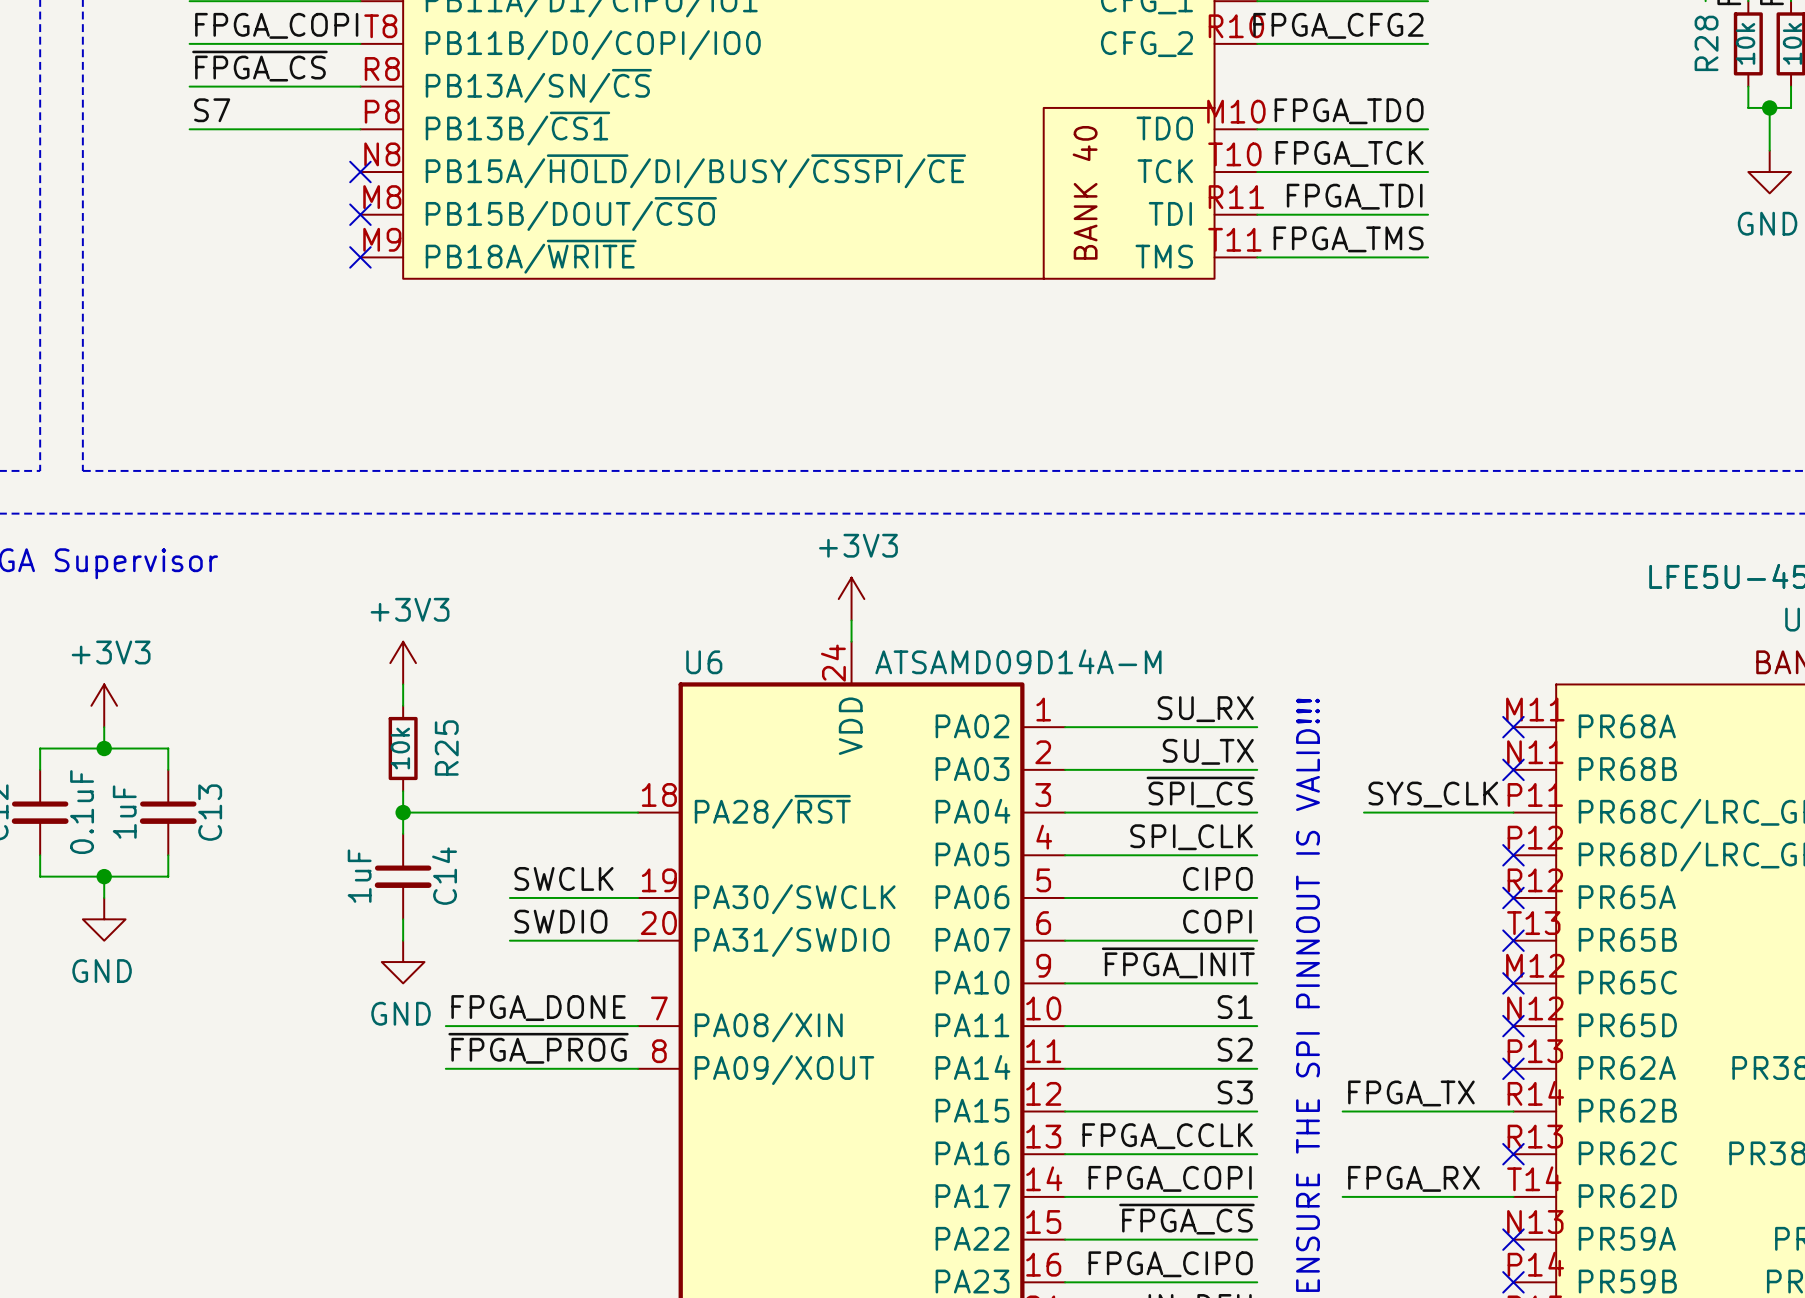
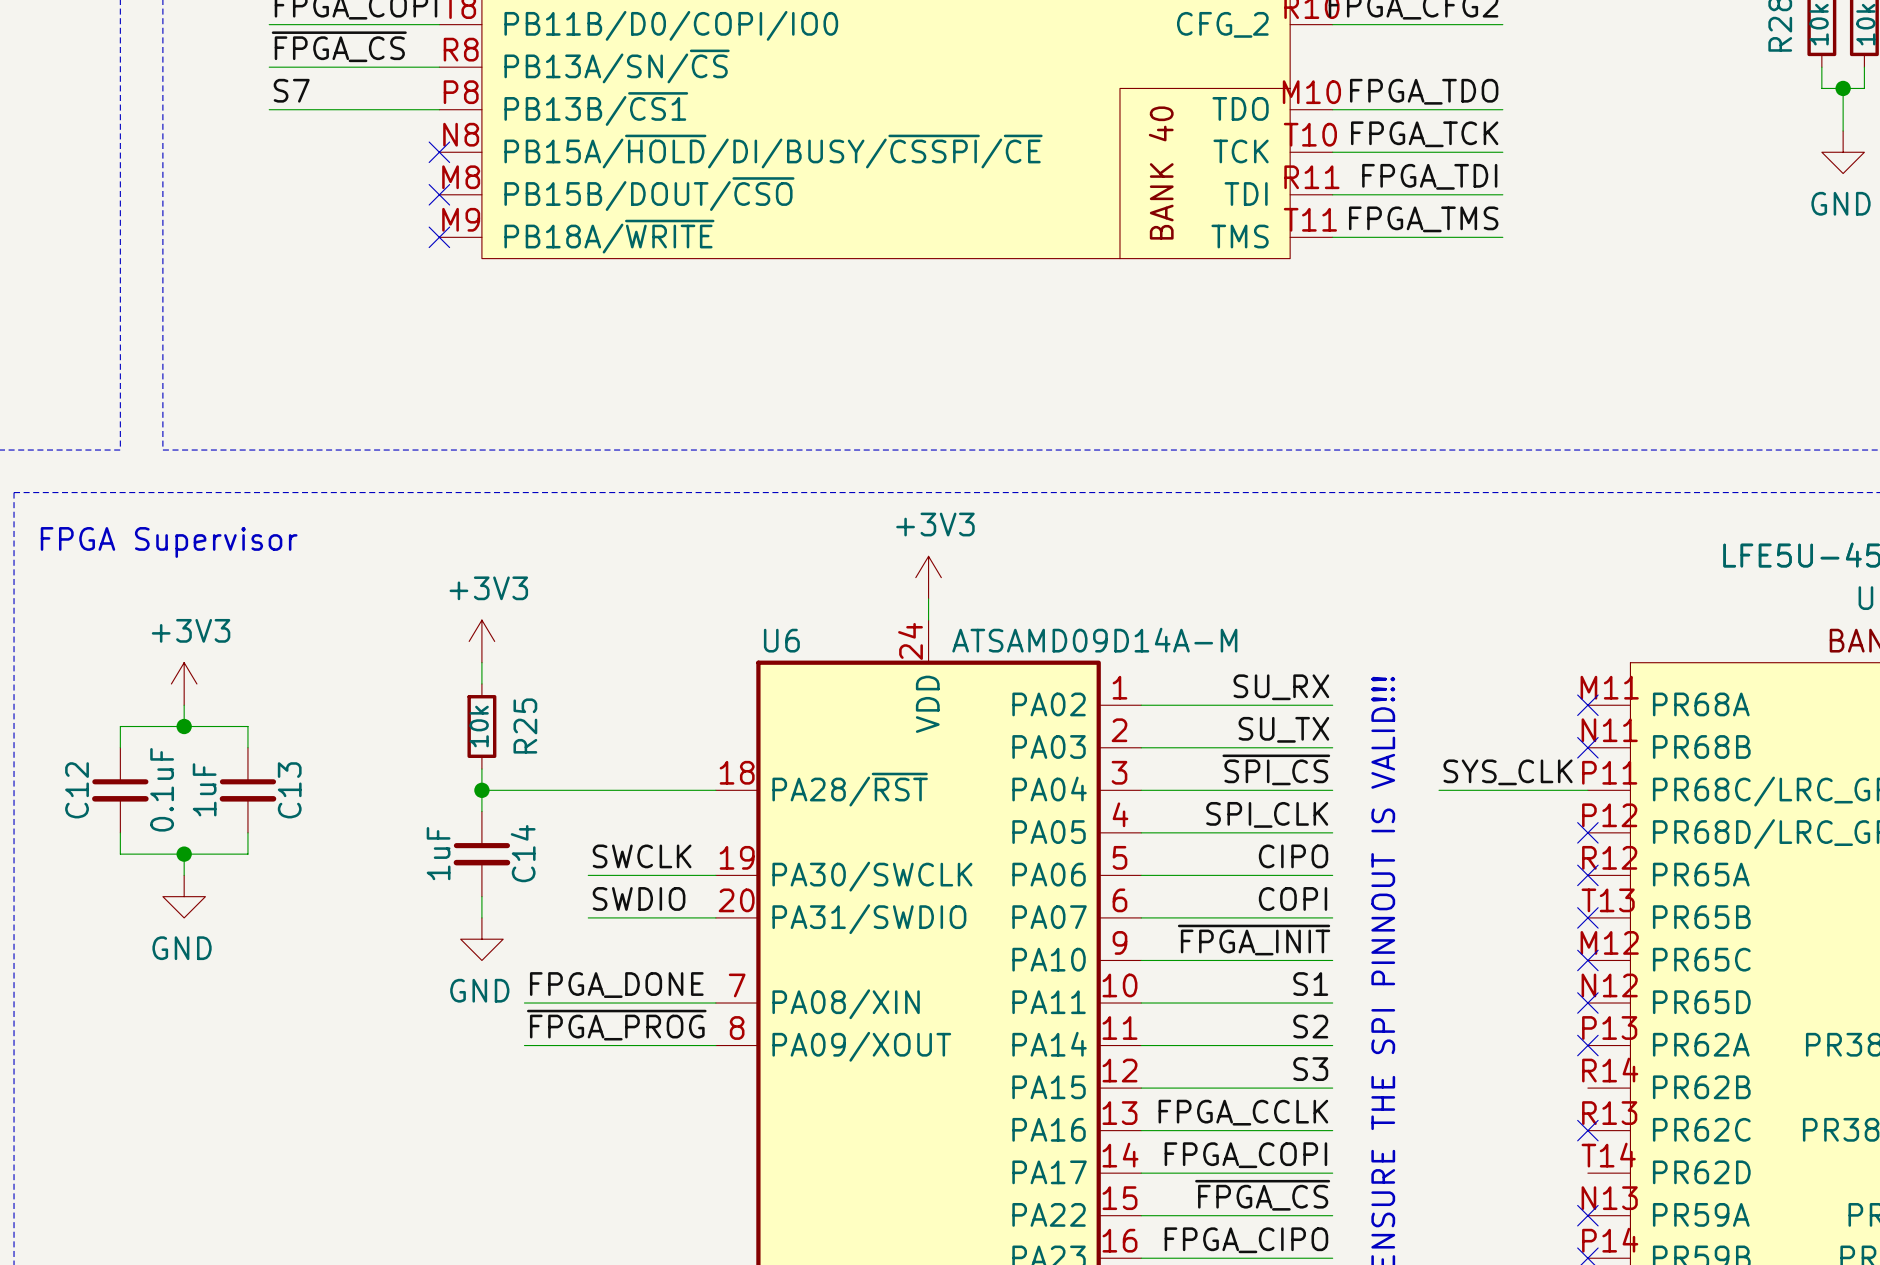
label: FPGA_TX (1411, 1093) -> none
wire: (1342, 1111) (1513, 1111) -> none
label: FPGA_RX (1413, 1178) -> none
wire: (1342, 1196) (1513, 1196) -> none

